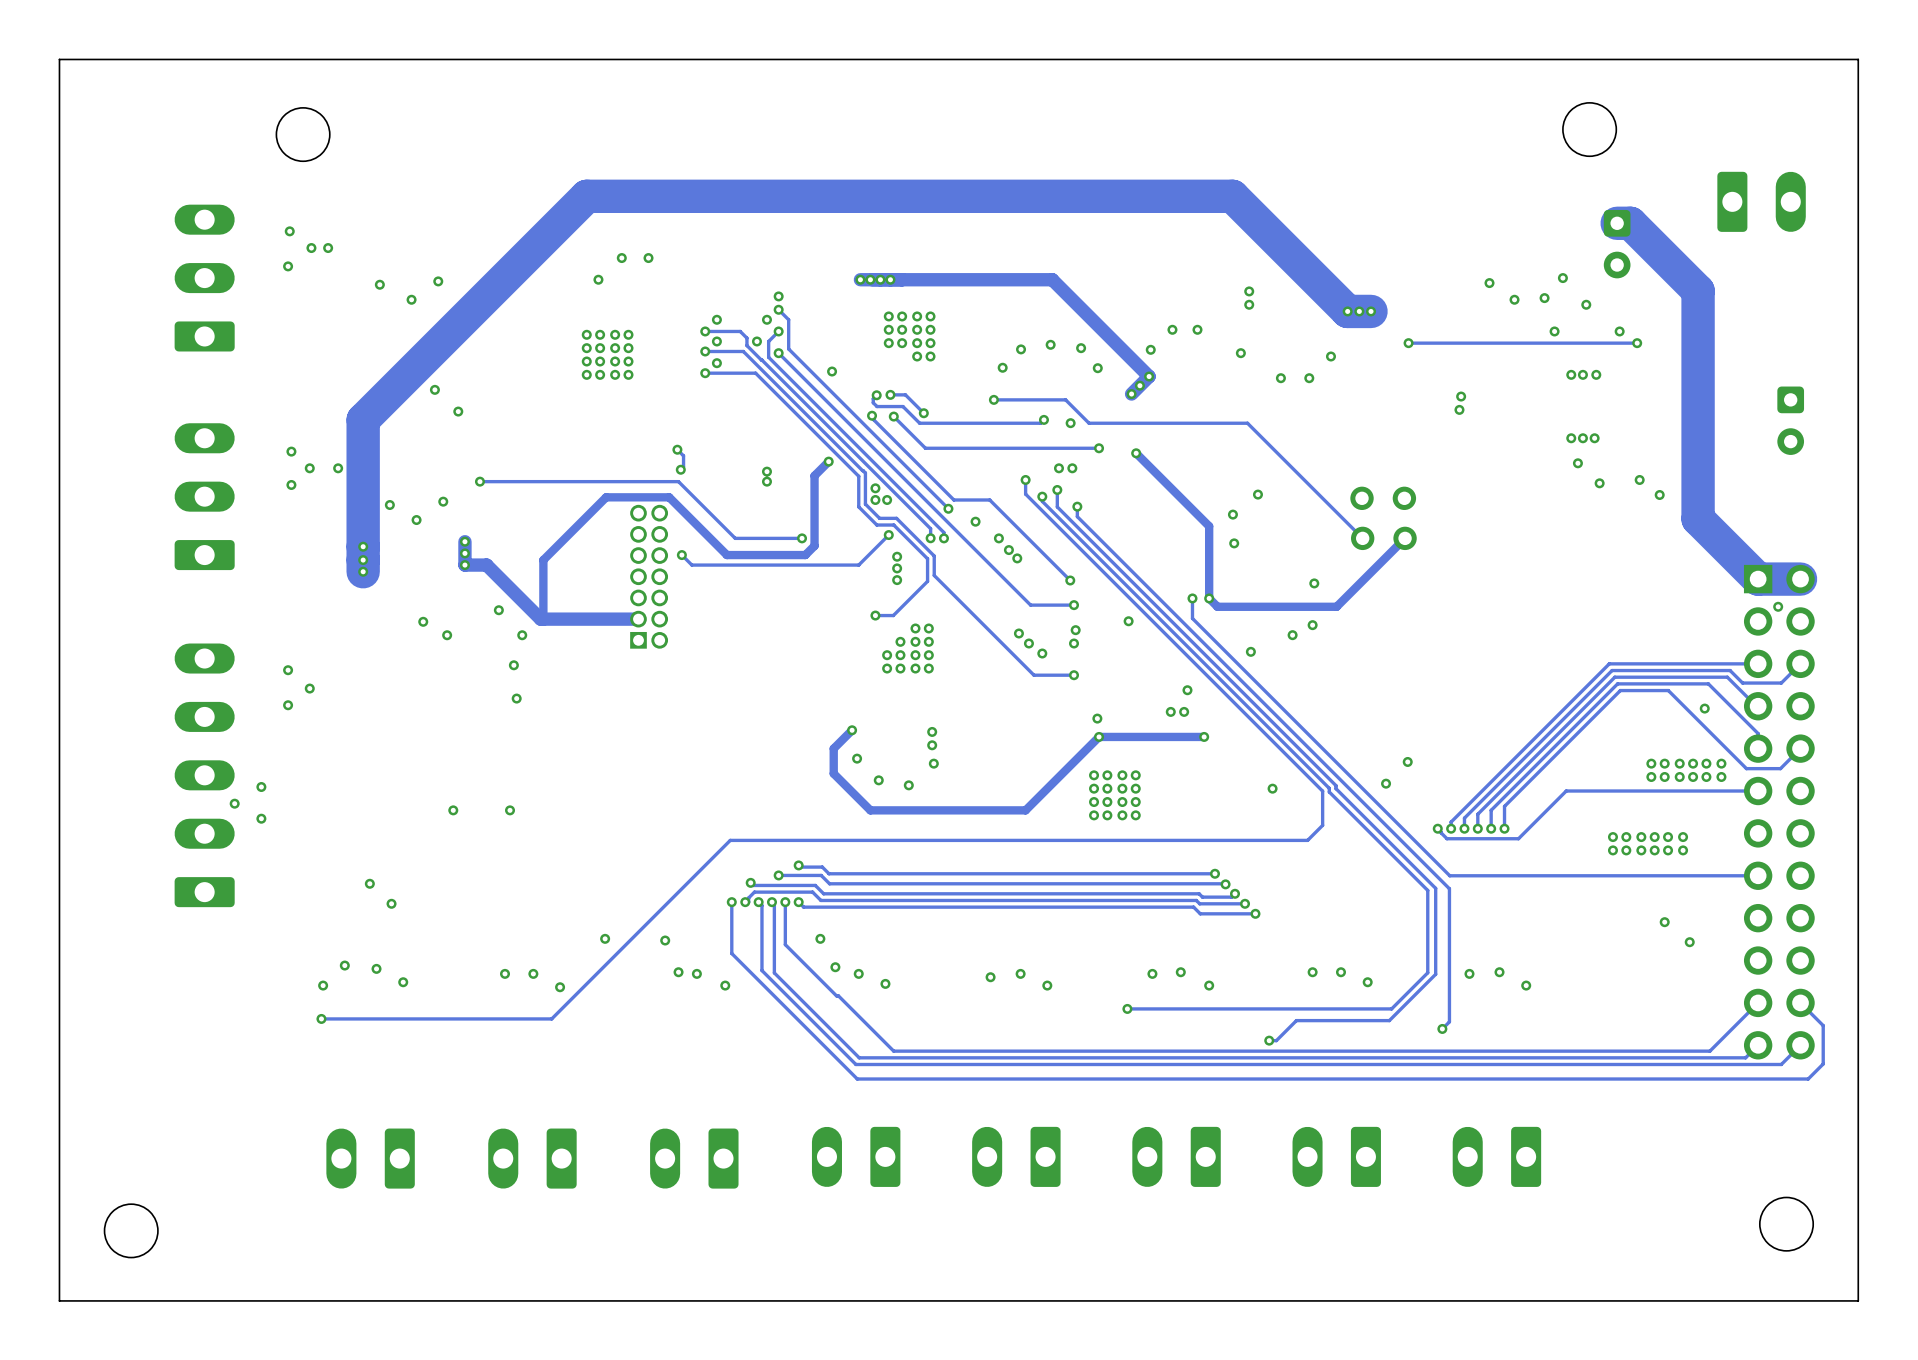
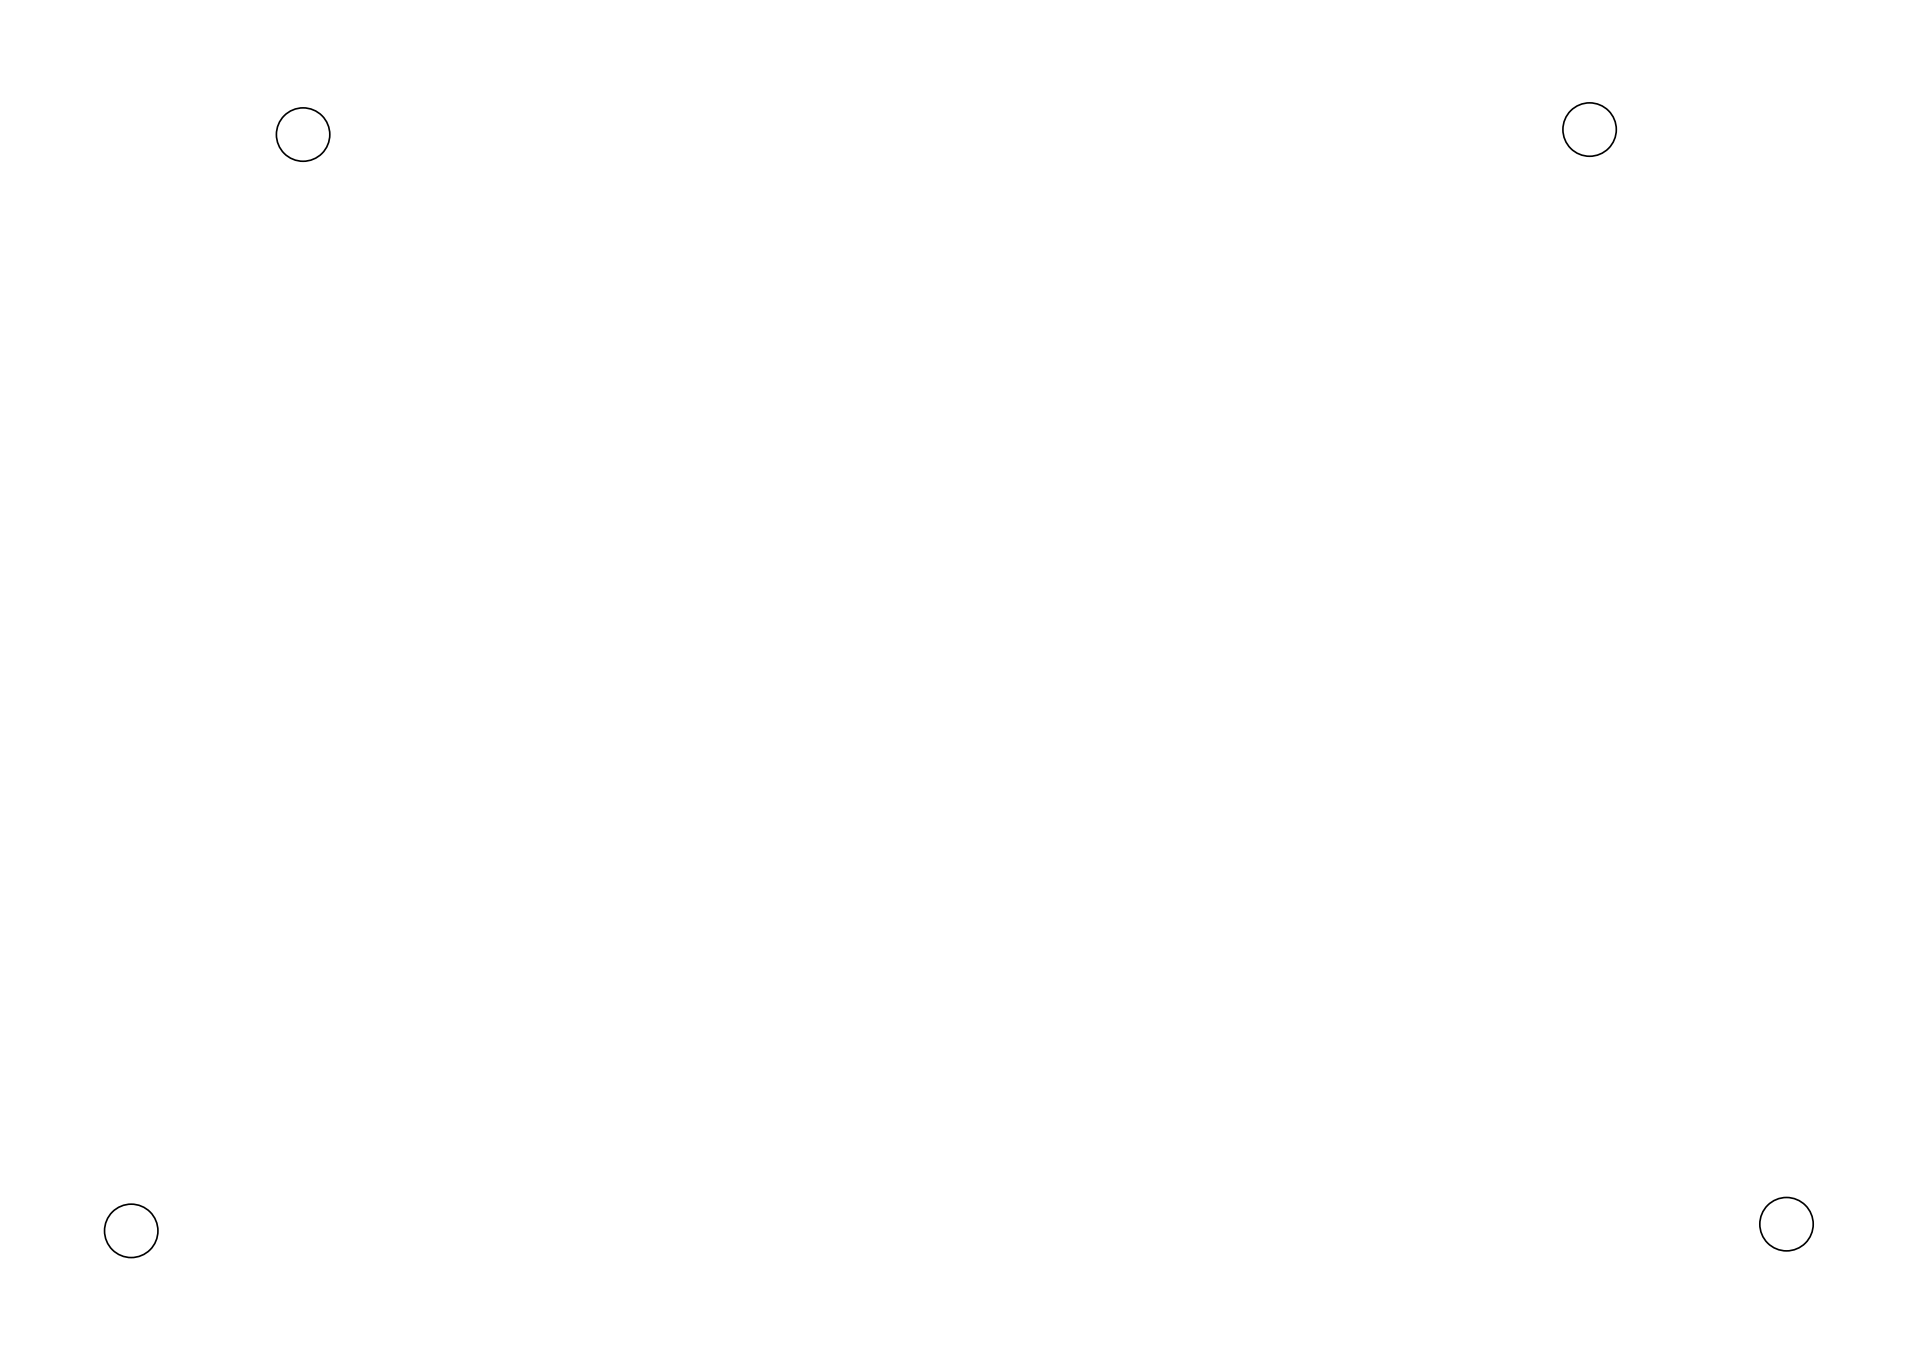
board edge: (1858, 59) (59, 59) (59, 1300) (1858, 1300) (1858, 59) -> none
part: (1761, 201) -> none
track: (1617, 223) (1630, 223) (1698, 290) (1698, 519) (1758, 579) (1800, 579) -> none
via: (289, 231) -> none
part: (1617, 244) -> none
via: (311, 248) -> none
via: (328, 248) -> none
via: (621, 258) -> none
via: (648, 258) -> none
via: (288, 266) -> none
part: (204, 278) -> none
via: (1562, 278) -> none
via: (598, 279) -> none
track: (860, 279) (1052, 279) (1149, 376) (1131, 394) -> none
via: (860, 279) -> none
via: (870, 279) -> none
via: (880, 279) -> none
via: (890, 279) -> none
via: (438, 281) -> none
via: (1489, 283) -> none
via: (379, 284) -> none
via: (1249, 291) -> none
via: (778, 296) -> none
via: (1544, 298) -> none
via: (411, 299) -> none
via: (1514, 299) -> none
via: (1249, 304) -> none
via: (1586, 304) -> none
track: (778, 309) (788, 319) (788, 349) (948, 508) -> none
via: (778, 309) -> none
via: (1347, 311) -> none
via: (1359, 311) -> none
track: (1371, 311) (1347, 311) (1232, 196) (586, 196) (363, 419) (363, 571) -> none
via: (1371, 311) -> none
via: (888, 316) -> none
via: (902, 316) -> none
via: (917, 316) -> none
via: (930, 316) -> none
via: (716, 319) -> none
via: (766, 319) -> none
via: (888, 329) -> none
via: (902, 329) -> none
via: (917, 329) -> none
via: (930, 329) -> none
via: (1172, 329) -> none
via: (1197, 329) -> none
track: (705, 331) (740, 331) (746, 338) (746, 345) (930, 528) (930, 538) -> none
via: (705, 331) -> none
track: (778, 331) (768, 341) (768, 357) (943, 532) (943, 538) -> none
via: (778, 331) -> none
via: (1554, 331) -> none
via: (1619, 331) -> none
via: (586, 334) -> none
via: (600, 334) -> none
via: (615, 334) -> none
via: (628, 334) -> none
via: (716, 341) -> none
via: (756, 341) -> none
track: (1406, 341) (1408, 343) (1637, 343) -> none
via: (888, 343) -> none
via: (902, 343) -> none
via: (917, 343) -> none
via: (930, 343) -> none
via: (1408, 343) -> none
via: (1637, 343) -> none
via: (1050, 344) -> none
via: (586, 348) -> none
via: (600, 348) -> none
via: (615, 348) -> none
via: (628, 348) -> none
via: (1081, 348) -> none
via: (1021, 349) -> none
via: (1150, 349) -> none
track: (705, 351) (743, 351) (865, 472) (865, 504) (879, 518) (896, 518) (934, 556) (934, 575) (1033, 675) (1074, 675) -> none
via: (705, 351) -> none
track: (778, 353) (1030, 605) (1074, 605) -> none
via: (778, 353) -> none
via: (1240, 353) -> none
via: (917, 356) -> none
via: (930, 356) -> none
via: (1330, 356) -> none
via: (586, 361) -> none
via: (600, 361) -> none
via: (615, 361) -> none
via: (628, 361) -> none
via: (716, 363) -> none
via: (1002, 367) -> none
via: (1097, 368) -> none
via: (832, 371) -> none
track: (705, 373) (755, 373) (858, 476) (858, 506) (876, 525) (893, 525) (927, 558) (927, 581) (893, 615) (875, 615) -> none
via: (705, 373) -> none
via: (586, 374) -> none
via: (600, 374) -> none
via: (615, 374) -> none
via: (628, 374) -> none
via: (1571, 374) -> none
via: (1582, 374) -> none
via: (1596, 374) -> none
via: (1149, 376) -> none
via: (1280, 378) -> none
via: (1309, 378) -> none
via: (1139, 385) -> none
via: (434, 389) -> none
track: (890, 394) (905, 394) (923, 413) -> none
via: (890, 394) -> none
via: (1131, 394) -> none
track: (876, 395) (873, 398) (873, 402) (877, 406) (903, 406) (919, 423) (1040, 423) (1043, 419) -> none
via: (876, 395) -> none
via: (1461, 396) -> none
track: (993, 399) (1065, 399) (1089, 423) (1247, 423) (1362, 538) -> none
via: (993, 399) -> none
via: (1459, 409) -> none
via: (458, 411) -> none
via: (923, 413) -> none
track: (872, 415) (873, 419) (953, 500) (989, 500) (1070, 580) -> none
via: (872, 415) -> none
track: (893, 416) (925, 448) (1099, 448) -> none
via: (893, 416) -> none
via: (1043, 419) -> none
part: (1790, 420) -> none
via: (1070, 423) -> none
via: (1571, 438) -> none
via: (1582, 438) -> none
via: (1594, 438) -> none
via: (1099, 448) -> none
track: (677, 449) (683, 455) (683, 467) (680, 469) -> none
via: (677, 449) -> none
via: (291, 451) -> none
track: (1136, 453) (1209, 526) (1209, 598) (1217, 606) (1336, 606) (1405, 538) -> none
via: (1136, 453) -> none
track: (828, 461) (814, 475) (814, 545) (805, 555) (726, 555) (669, 497) (606, 497) (543, 560) (543, 619) -> none
via: (828, 461) -> none
via: (1577, 463) -> none
via: (309, 468) -> none
via: (338, 468) -> none
via: (1058, 468) -> none
via: (1072, 468) -> none
via: (680, 469) -> none
via: (766, 471) -> none
track: (1025, 479) (1025, 494) (1322, 791) (1322, 825) (1307, 840) (730, 840) (551, 1018) (321, 1018) -> none
via: (1025, 479) -> none
via: (1639, 479) -> none
track: (479, 481) (678, 481) (735, 538) (802, 538) -> none
via: (479, 481) -> none
via: (766, 481) -> none
via: (1599, 483) -> none
via: (291, 484) -> none
via: (875, 488) -> none
track: (1057, 489) (1057, 506) (1335, 785) (1335, 788) (1435, 888) (1435, 974) (1389, 1020) (1296, 1020) (1276, 1040) (1269, 1040) -> none
via: (1057, 489) -> none
via: (1257, 494) -> none
via: (1659, 494) -> none
part: (204, 496) -> none
track: (1042, 496) (1042, 501) (1329, 788) (1329, 792) (1427, 890) (1427, 972) (1391, 1008) (1127, 1008) -> none
via: (1042, 496) -> none
part: (1383, 498) -> none
via: (875, 500) -> none
via: (887, 500) -> none
via: (443, 501) -> none
via: (389, 505) -> none
track: (1077, 506) (1077, 516) (1449, 888) (1449, 1021) (1442, 1028) -> none
via: (1077, 506) -> none
via: (948, 508) -> none
via: (1232, 514) -> none
via: (416, 520) -> none
via: (975, 521) -> none
track: (888, 535) (858, 565) (691, 565) (681, 555) -> none
via: (888, 535) -> none
via: (802, 538) -> none
via: (930, 538) -> none
via: (943, 538) -> none
via: (998, 538) -> none
part: (1383, 538) -> none
track: (464, 541) (464, 565) (486, 565) (540, 619) (638, 619) -> none
via: (464, 541) -> none
via: (1234, 543) -> none
via: (363, 546) -> none
via: (1008, 550) -> none
via: (464, 553) -> none
via: (681, 555) -> none
via: (897, 556) -> none
via: (1017, 558) -> none
via: (363, 560) -> none
via: (464, 565) -> none
via: (897, 568) -> none
via: (363, 571) -> none
part: (649, 576) -> none
via: (897, 580) -> none
via: (1070, 580) -> none
via: (1314, 583) -> none
track: (1192, 598) (1192, 618) (1449, 875) (1758, 875) -> none
via: (1192, 598) -> none
via: (1209, 598) -> none
via: (1074, 605) -> none
via: (1778, 606) -> none
via: (498, 610) -> none
via: (875, 615) -> none
via: (423, 621) -> none
via: (1128, 621) -> none
via: (1312, 625) -> none
via: (915, 628) -> none
via: (928, 628) -> none
via: (1075, 630) -> none
via: (1018, 633) -> none
via: (447, 635) -> none
via: (522, 635) -> none
via: (1292, 635) -> none
via: (900, 641) -> none
via: (915, 641) -> none
via: (928, 641) -> none
via: (1028, 643) -> none
via: (1074, 643) -> none
via: (1250, 651) -> none
via: (1042, 653) -> none
via: (887, 655) -> none
via: (900, 655) -> none
via: (915, 655) -> none
via: (928, 655) -> none
track: (1758, 663) (1609, 663) (1451, 822) (1451, 828) -> none
track: (1800, 663) (1781, 683) (1742, 683) (1730, 670) (1612, 670) (1464, 818) (1464, 828) -> none
via: (513, 665) -> none
via: (887, 668) -> none
via: (900, 668) -> none
via: (915, 668) -> none
via: (928, 668) -> none
via: (288, 670) -> none
via: (1074, 675) -> none
via: (309, 688) -> none
via: (1187, 690) -> none
via: (516, 698) -> none
via: (288, 705) -> none
track: (1758, 706) (1727, 677) (1614, 677) (1477, 814) (1477, 828) -> none
via: (1704, 708) -> none
via: (1170, 711) -> none
via: (1184, 711) -> none
via: (1097, 718) -> none
track: (852, 730) (833, 748) (833, 773) (870, 810) (1025, 810) (1099, 736) (1204, 736) -> none
via: (852, 730) -> none
via: (932, 731) -> none
via: (1099, 736) -> none
via: (1204, 736) -> none
via: (932, 745) -> none
track: (1758, 748) (1758, 733) (1708, 683) (1617, 683) (1491, 810) (1491, 828) -> none
track: (1800, 748) (1780, 768) (1746, 768) (1668, 690) (1620, 690) (1504, 806) (1504, 828) -> none
via: (857, 758) -> none
via: (1407, 761) -> none
via: (933, 763) -> none
via: (1651, 763) -> none
via: (1664, 763) -> none
via: (1679, 763) -> none
via: (1693, 763) -> none
via: (1706, 763) -> none
via: (1721, 763) -> none
part: (204, 775) -> none
via: (1094, 775) -> none
via: (1107, 775) -> none
via: (1122, 775) -> none
via: (1135, 775) -> none
via: (1651, 776) -> none
via: (1664, 776) -> none
via: (1679, 776) -> none
via: (1693, 776) -> none
via: (1706, 776) -> none
via: (1721, 776) -> none
via: (878, 780) -> none
via: (1386, 783) -> none
via: (908, 785) -> none
via: (261, 787) -> none
via: (1094, 788) -> none
via: (1107, 788) -> none
via: (1122, 788) -> none
via: (1135, 788) -> none
via: (1272, 788) -> none
track: (1758, 791) (1566, 791) (1518, 838) (1446, 838) (1437, 828) -> none
via: (1094, 802) -> none
via: (1107, 802) -> none
via: (1122, 802) -> none
via: (1135, 802) -> none
via: (234, 803) -> none
via: (453, 810) -> none
via: (510, 810) -> none
part: (1779, 812) -> none
via: (1094, 815) -> none
via: (1107, 815) -> none
via: (1122, 815) -> none
via: (1135, 815) -> none
via: (261, 818) -> none
via: (1437, 828) -> none
via: (1451, 828) -> none
via: (1464, 828) -> none
via: (1477, 828) -> none
via: (1491, 828) -> none
via: (1504, 828) -> none
via: (1612, 837) -> none
via: (1626, 837) -> none
via: (1641, 837) -> none
via: (1654, 837) -> none
via: (1668, 837) -> none
via: (1683, 837) -> none
via: (1612, 850) -> none
via: (1626, 850) -> none
via: (1641, 850) -> none
via: (1654, 850) -> none
via: (1668, 850) -> none
via: (1683, 850) -> none
track: (798, 865) (800, 867) (822, 867) (829, 873) (1214, 873) -> none
via: (798, 865) -> none
via: (1214, 873) -> none
track: (778, 875) (821, 875) (829, 883) (1225, 884) -> none
via: (778, 875) -> none
track: (750, 882) (753, 885) (815, 885) (823, 893) (1199, 893) (1202, 897) (1231, 897) (1235, 893) -> none
via: (750, 882) -> none
via: (369, 883) -> none
via: (1225, 884) -> none
via: (1235, 893) -> none
track: (731, 902) (731, 953) (857, 1079) (1808, 1079) (1823, 1063) (1823, 1025) (1800, 1002) -> none
via: (731, 902) -> none
track: (745, 902) (748, 902) (748, 897) (754, 892) (812, 892) (820, 900) (1196, 900) (1199, 903) (1245, 903) -> none
via: (745, 902) -> none
track: (758, 902) (761, 905) (761, 970) (855, 1064) (1781, 1064) (1800, 1045) -> none
via: (758, 902) -> none
track: (771, 902) (774, 904) (774, 972) (859, 1057) (1745, 1057) (1758, 1045) -> none
via: (771, 902) -> none
track: (785, 902) (785, 944) (893, 1051) (1709, 1051) (1758, 1002) -> none
via: (785, 902) -> none
track: (798, 902) (803, 907) (1193, 907) (1200, 913) (1255, 913) -> none
via: (798, 902) -> none
via: (391, 903) -> none
via: (1245, 903) -> none
via: (1255, 913) -> none
via: (1664, 922) -> none
via: (605, 938) -> none
via: (820, 938) -> none
via: (665, 940) -> none
via: (1689, 942) -> none
via: (344, 965) -> none
via: (835, 967) -> none
via: (376, 968) -> none
via: (678, 972) -> none
via: (1180, 972) -> none
via: (1312, 972) -> none
via: (1340, 972) -> none
via: (1499, 972) -> none
via: (505, 973) -> none
via: (533, 973) -> none
via: (696, 973) -> none
via: (858, 973) -> none
via: (1020, 973) -> none
via: (1152, 973) -> none
via: (1469, 973) -> none
via: (990, 977) -> none
via: (403, 982) -> none
via: (1367, 982) -> none
via: (885, 983) -> none
via: (323, 985) -> none
via: (725, 985) -> none
via: (1047, 985) -> none
via: (1209, 985) -> none
via: (1526, 985) -> none
via: (560, 987) -> none
via: (1127, 1008) -> none
via: (321, 1018) -> none
via: (1442, 1028) -> none
via: (1269, 1040) -> none
part: (856, 1156) -> none
part: (1016, 1156) -> none
part: (1176, 1156) -> none
part: (1336, 1156) -> none
part: (1496, 1156) -> none
part: (370, 1158) -> none
part: (532, 1158) -> none
part: (694, 1158) -> none

